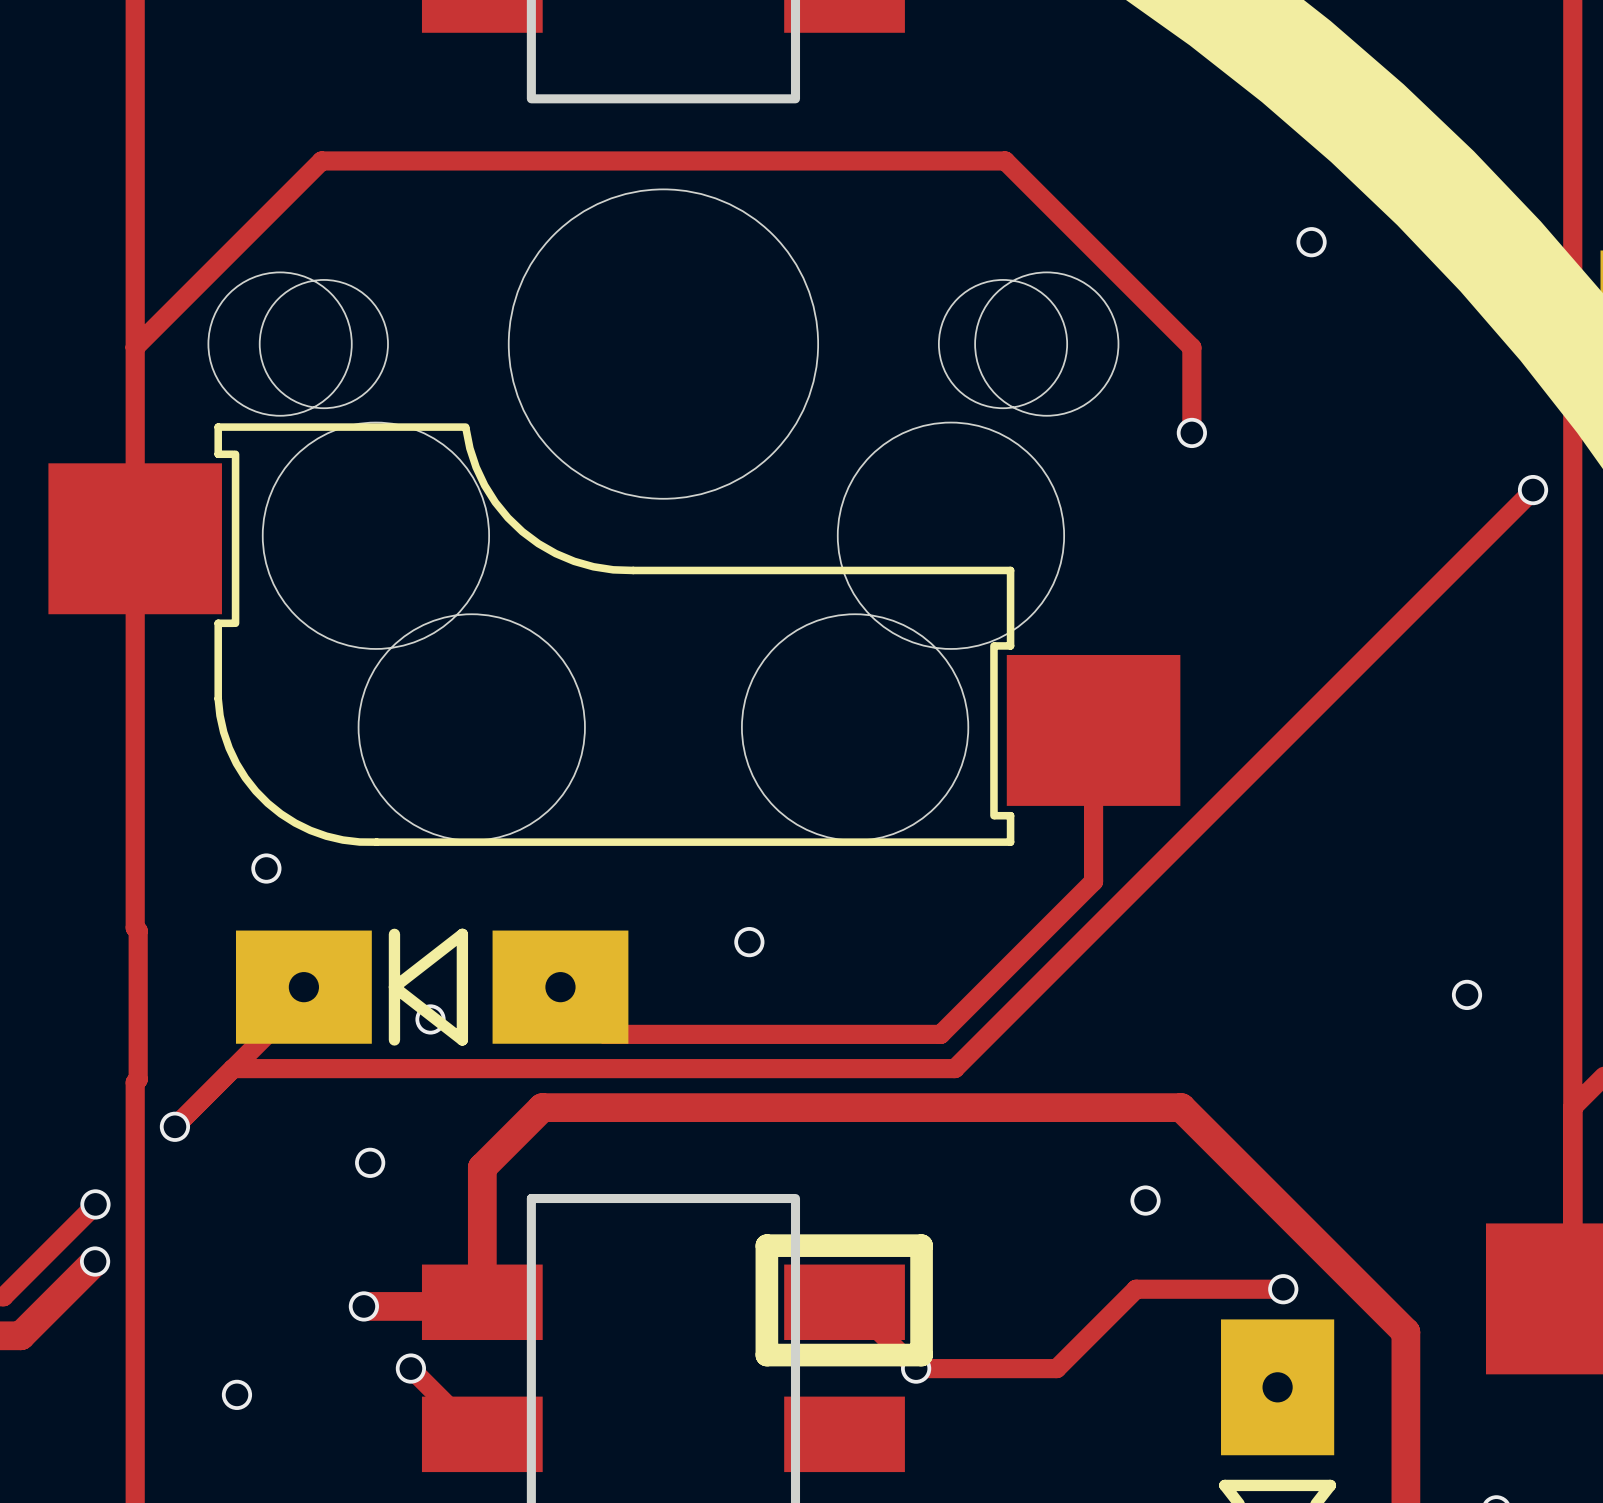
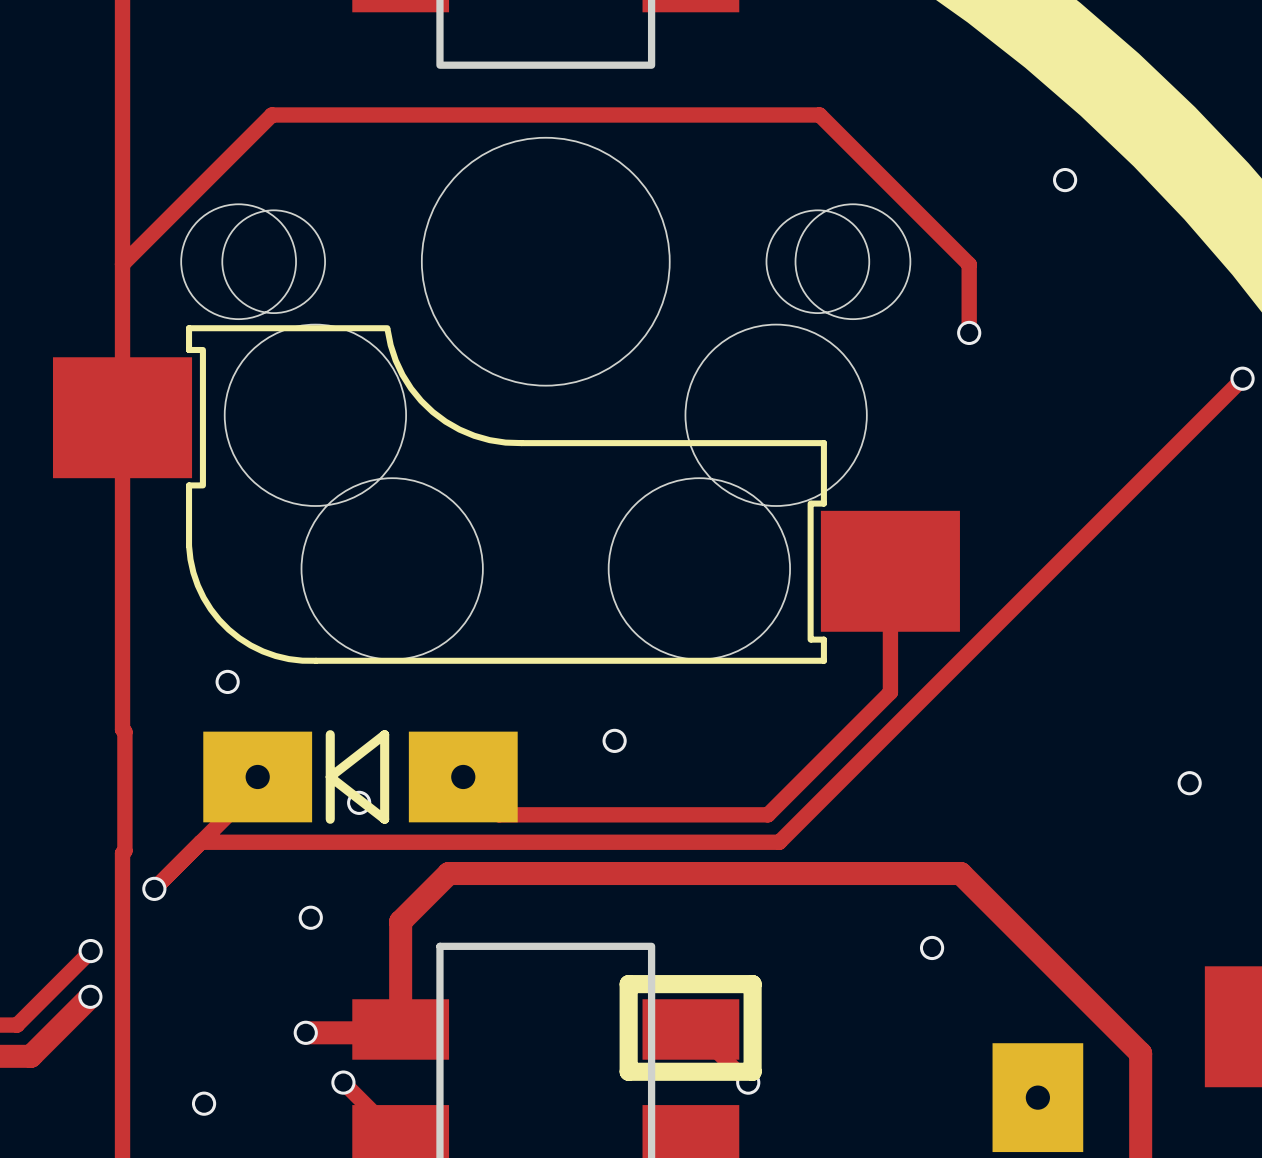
track: (1283, 1289) (1136, 1289) (1056, 1368) (916, 1368) -> none
via: (1283, 1289) -> none

